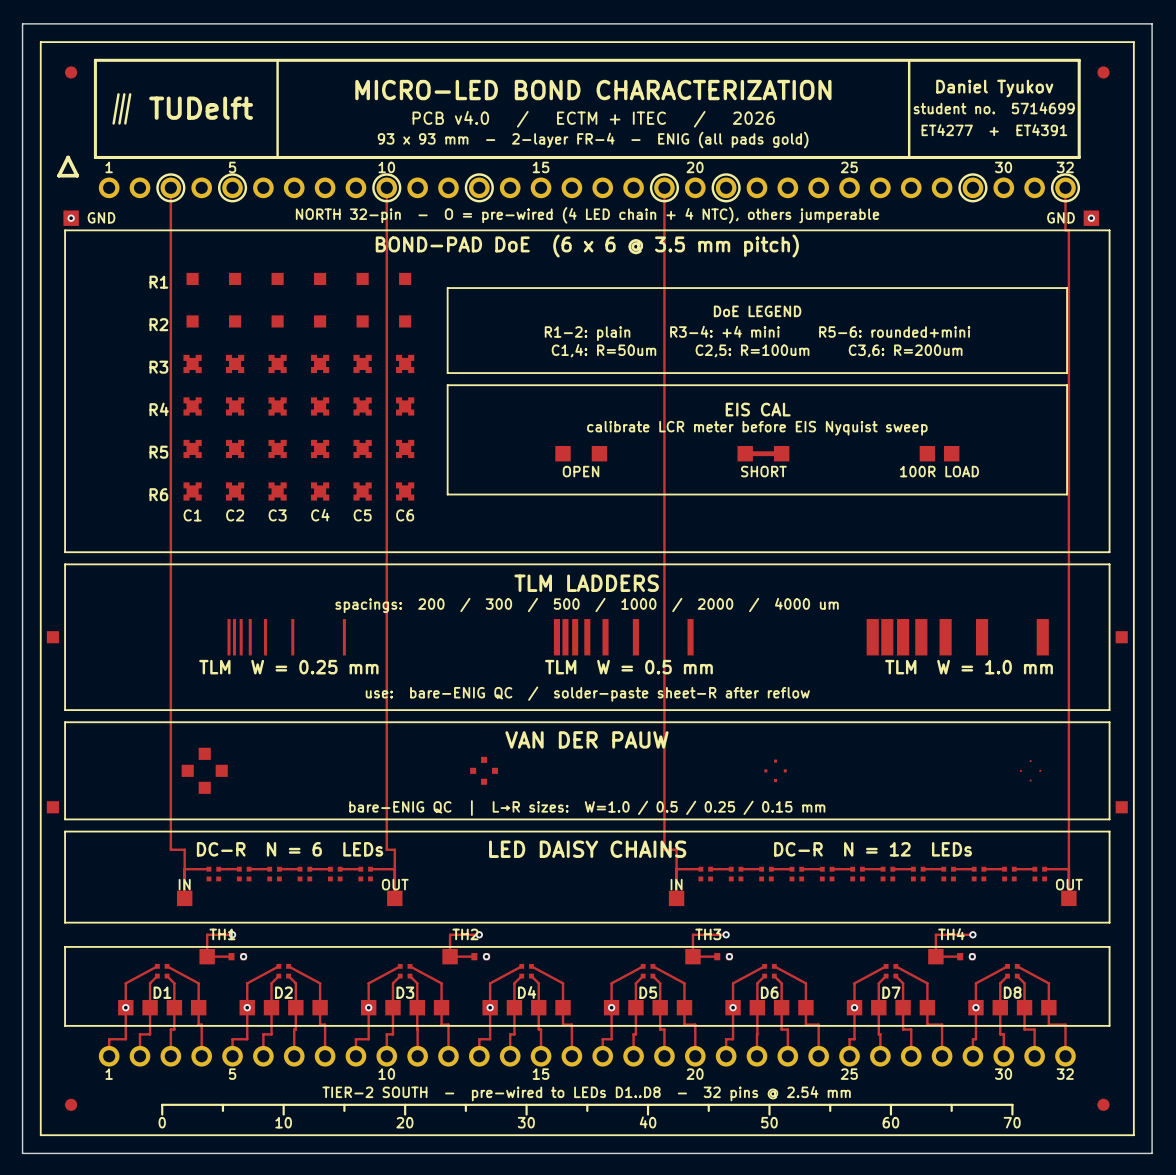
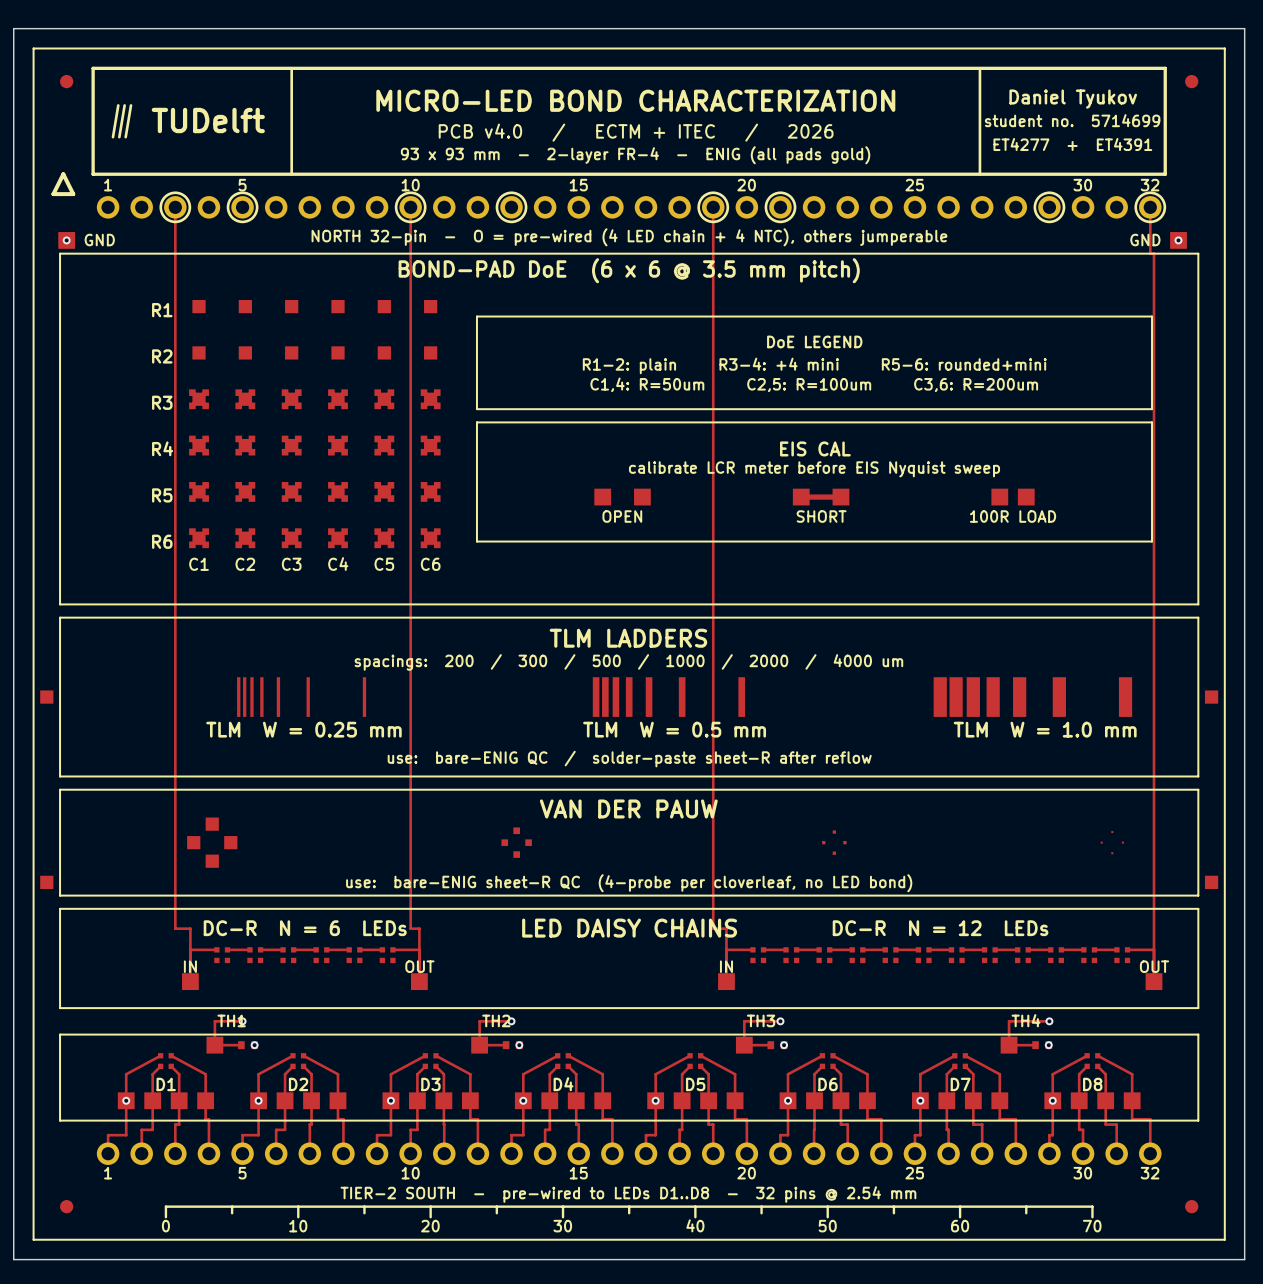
text: bare-ENIG QC | L→R sizes: W=1.0 / 0.5 / 0.25 / 0.15 mm (587, 808) -> use: bare-ENIG sheet-R QC (4-probe per cloverleaf, no LED bond) (629, 883)

